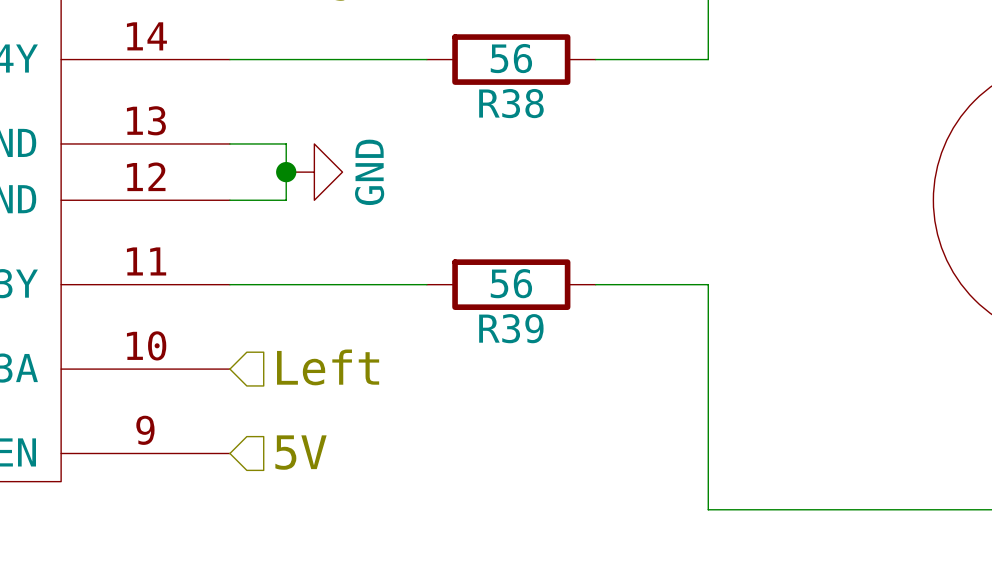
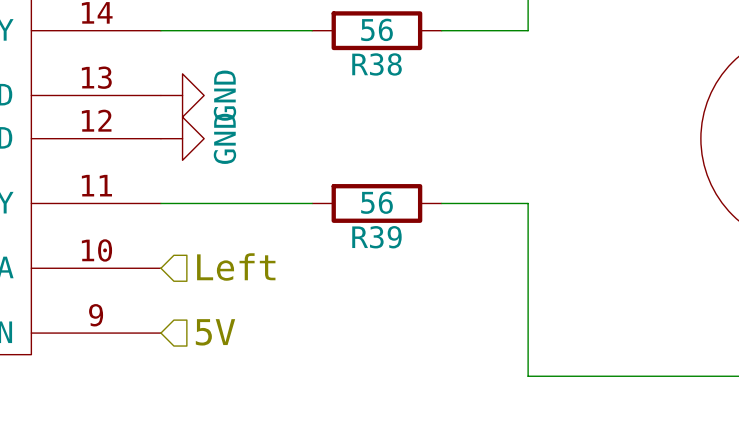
wire: (229, 143) (286, 143) (286, 200) (229, 200) -> none
power symbol: none -> GND (182, 95)
junction: (286, 172) -> none
power symbol: GND (314, 172) -> none
power symbol: none -> GND (182, 138)

